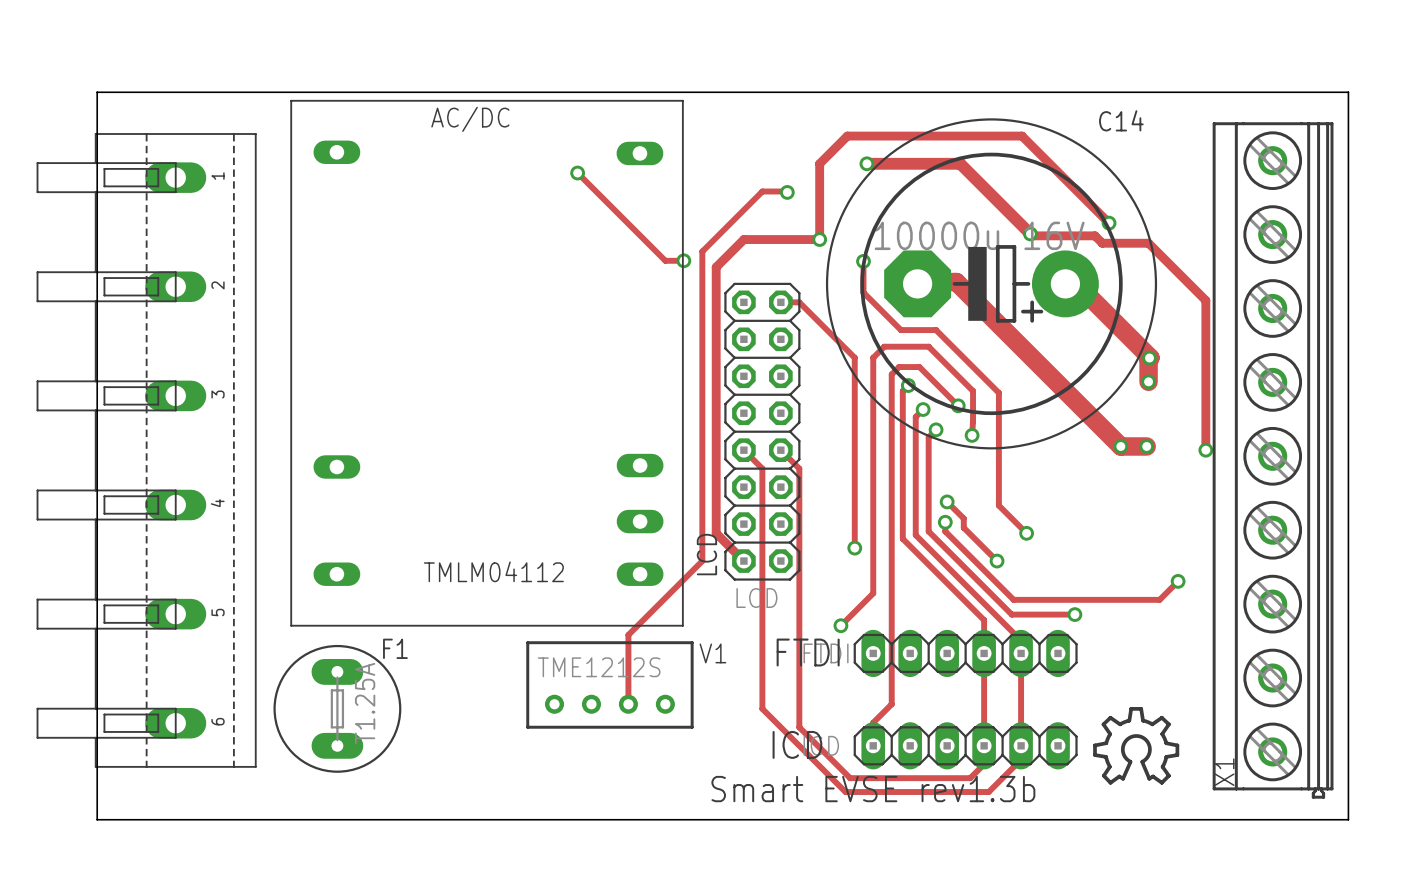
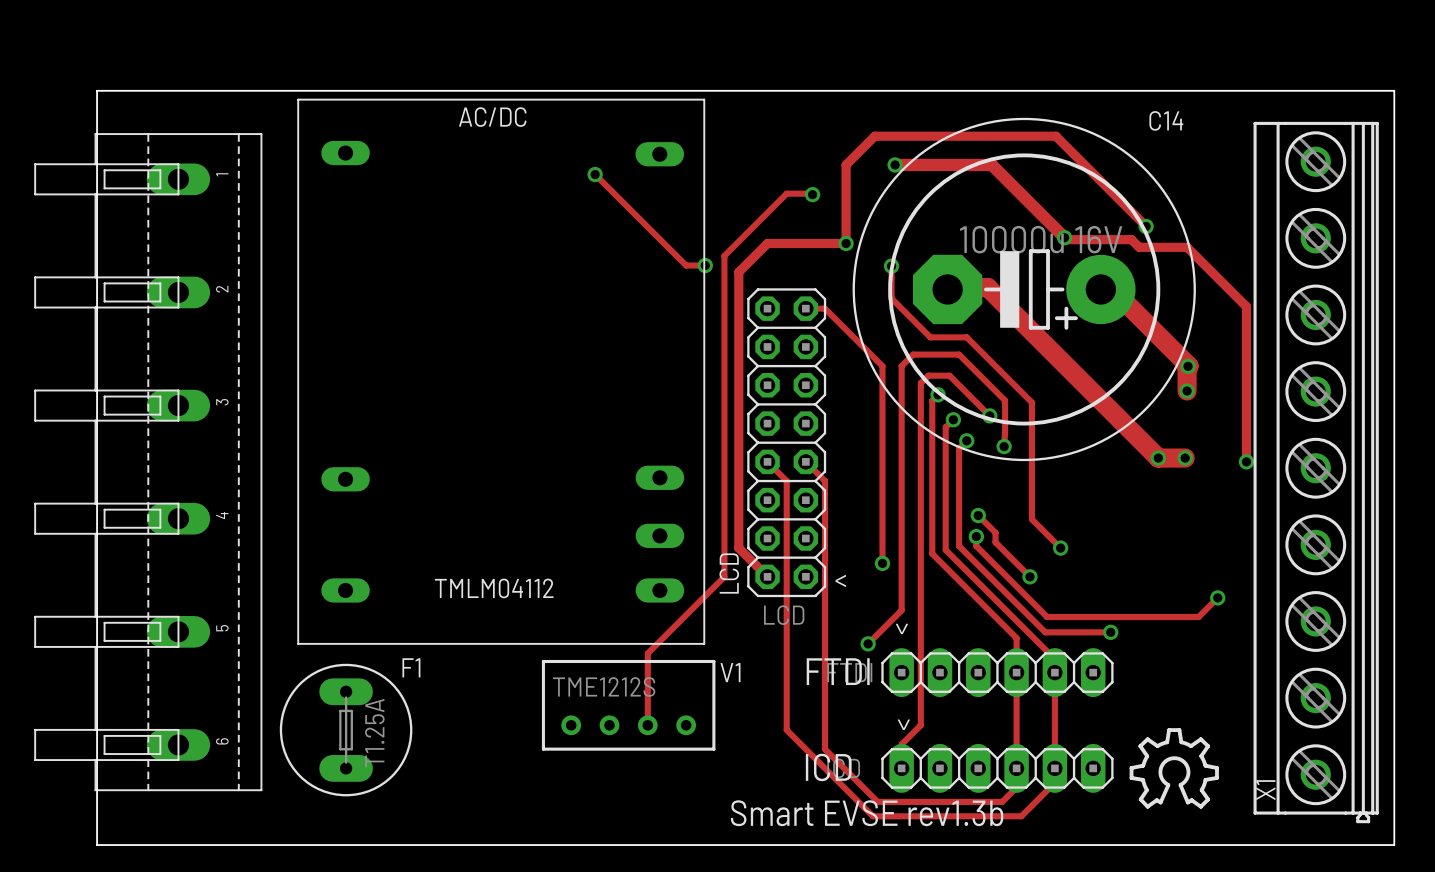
text: none -> < (840, 580)
text: none -> < (901, 628)
text: none -> < (903, 724)

